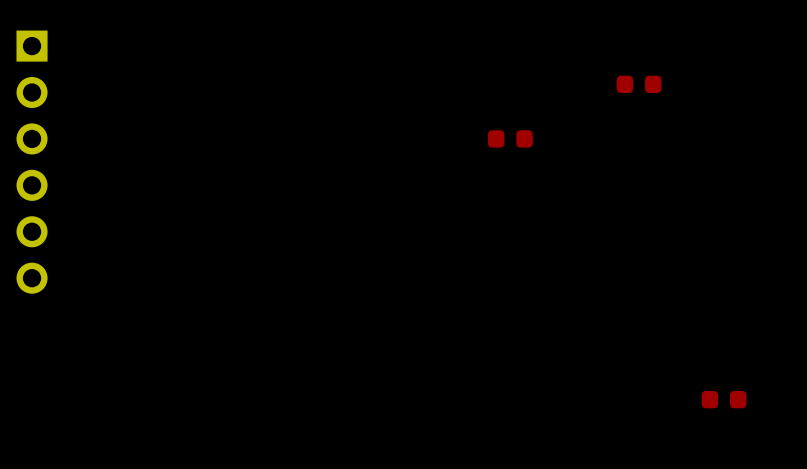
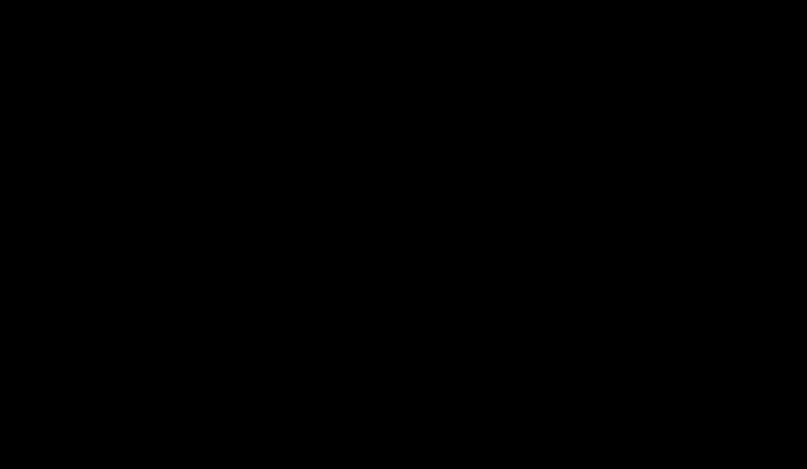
part: (639, 84) -> none
part: (510, 138) -> none
part: (32, 162) -> none
part: (724, 399) -> none

